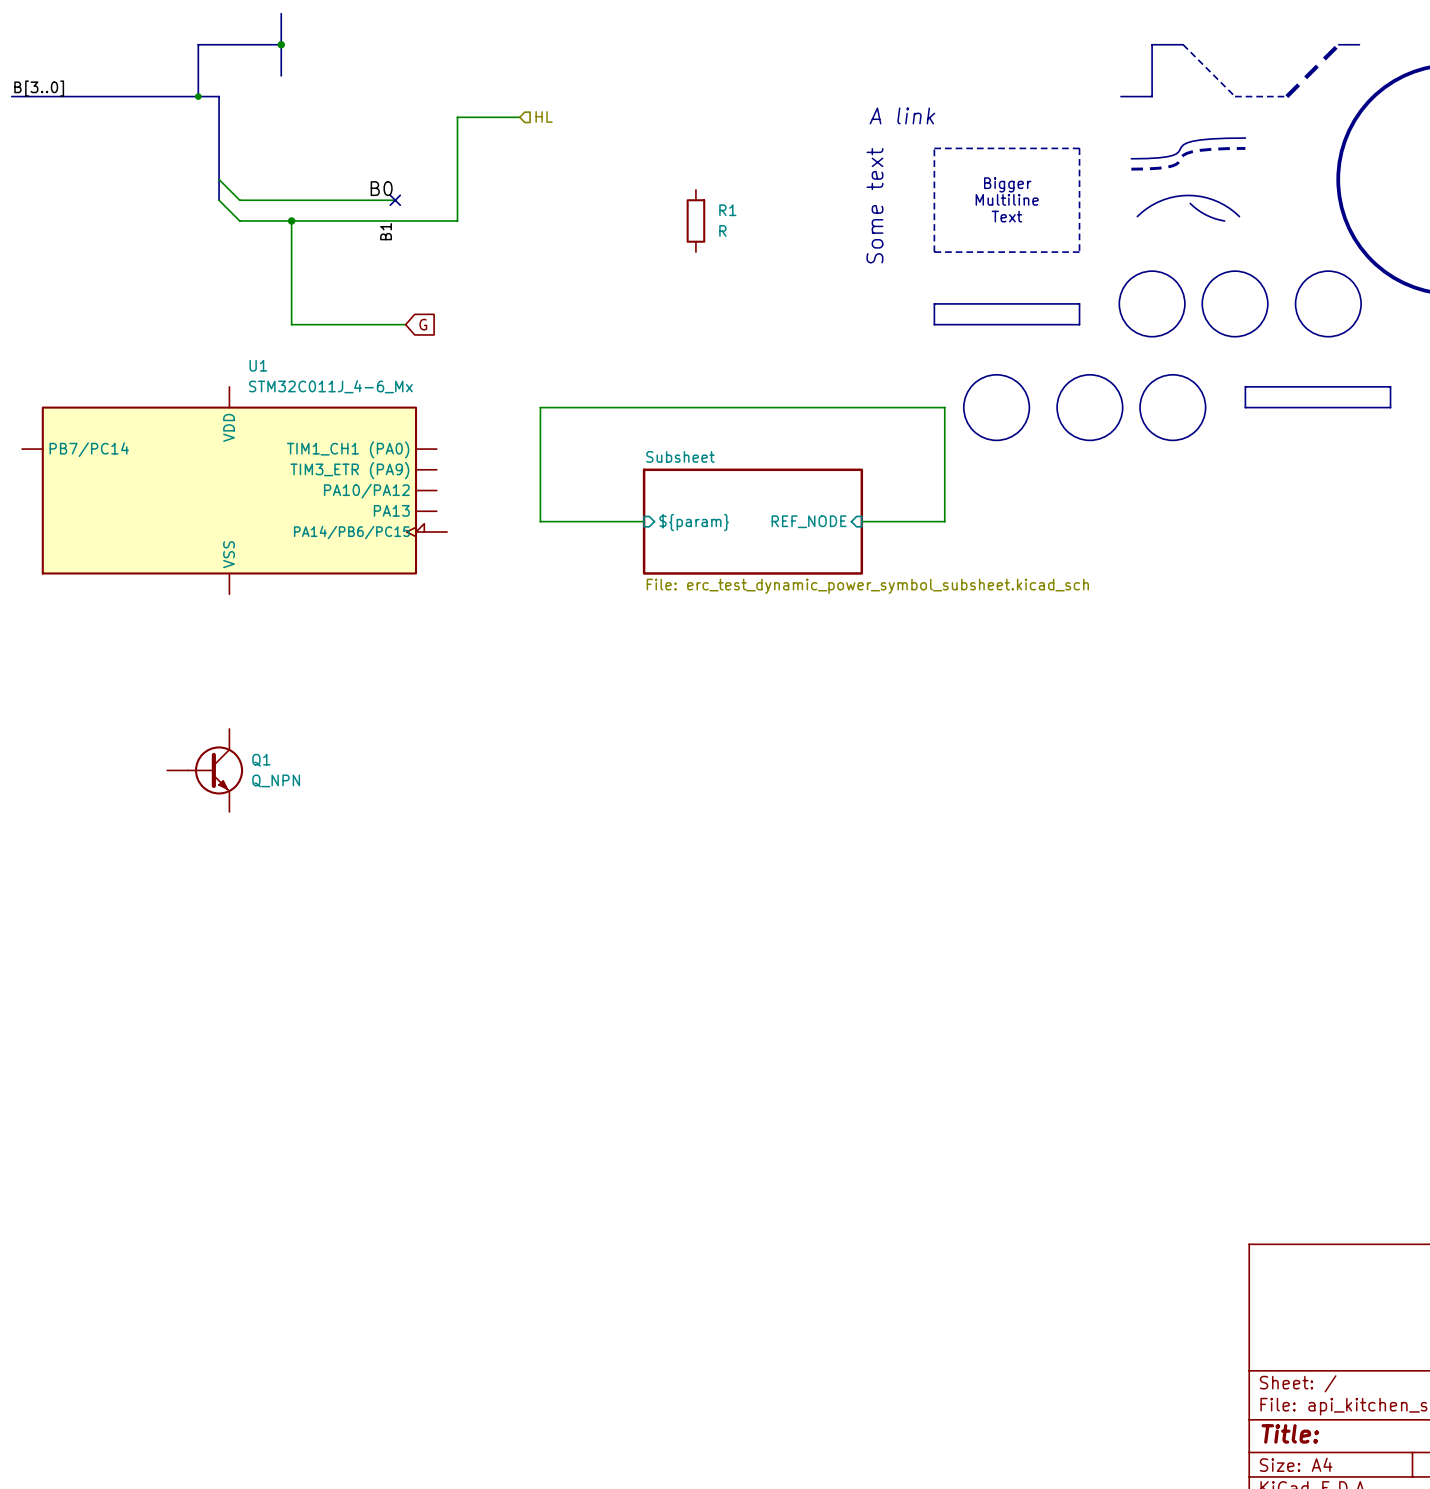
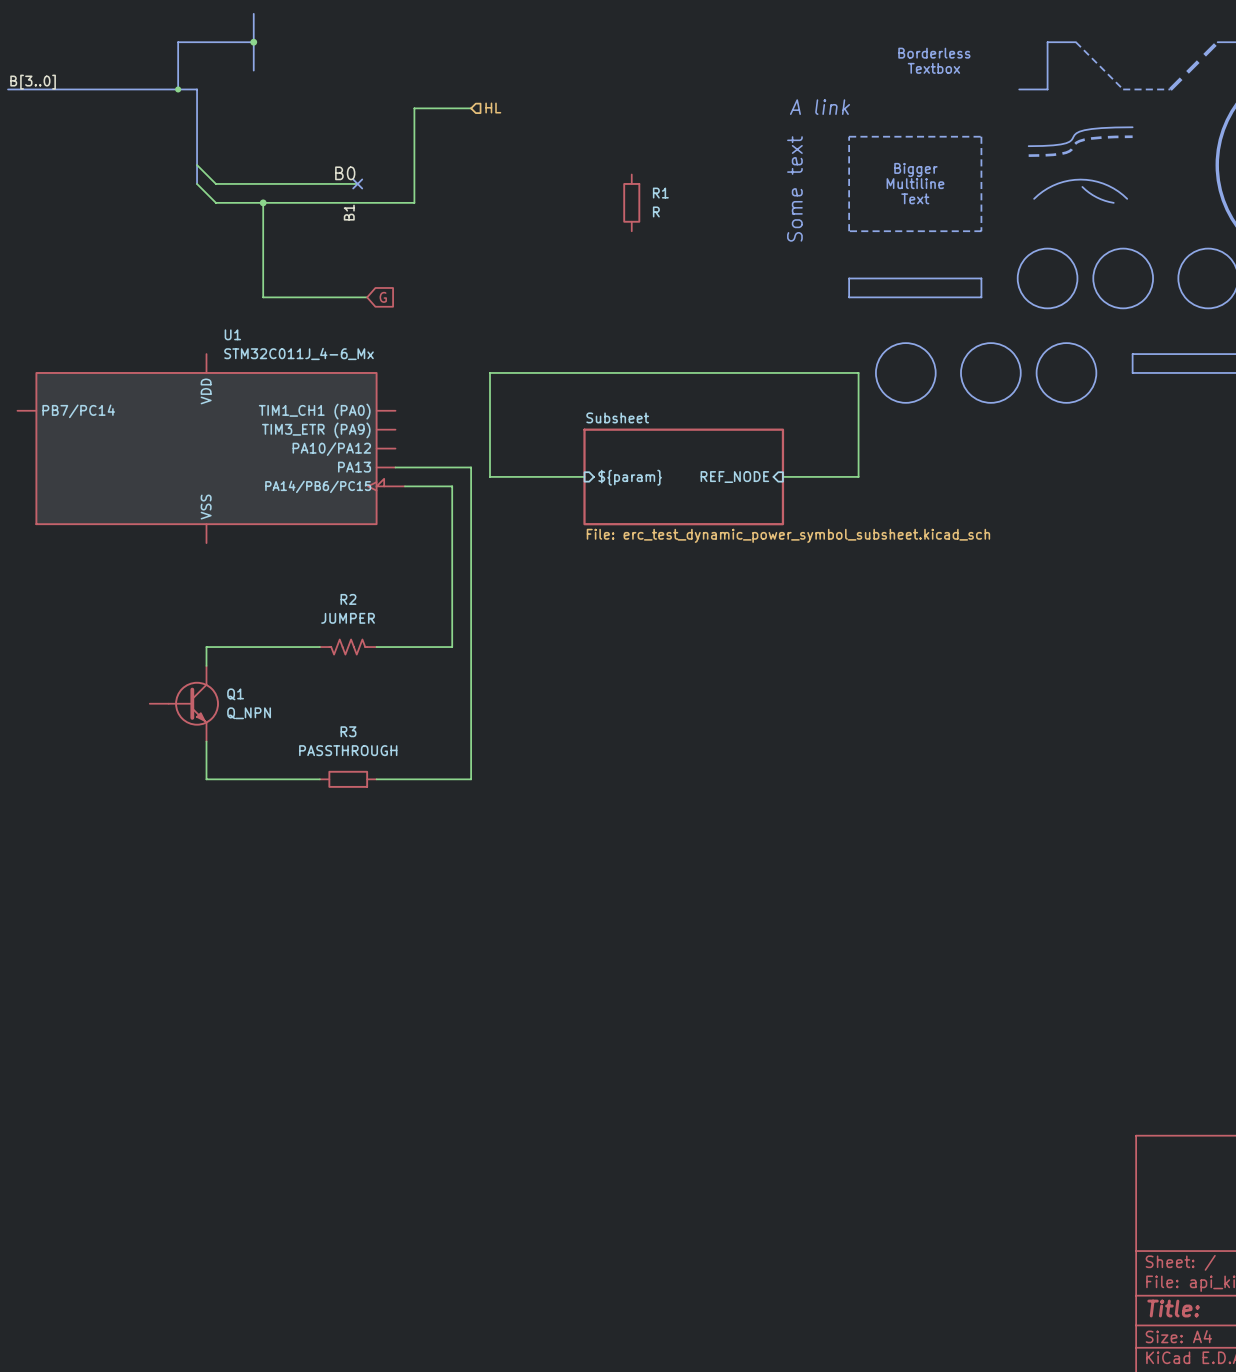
text: none -> Borderless (934, 53)
text: none -> Textbox (933, 68)
wire: none -> (395, 467) (471, 467) (471, 779) (376, 779)
wire: none -> (404, 486) (452, 486) (452, 647) (376, 647)
wire: none -> (319, 647) (206, 647) (206, 665)
R2: none -> JUMPER (348, 647)
wire: none -> (206, 741) (206, 779) (319, 779)
R3: none -> PASSTHROUGH (348, 779)

